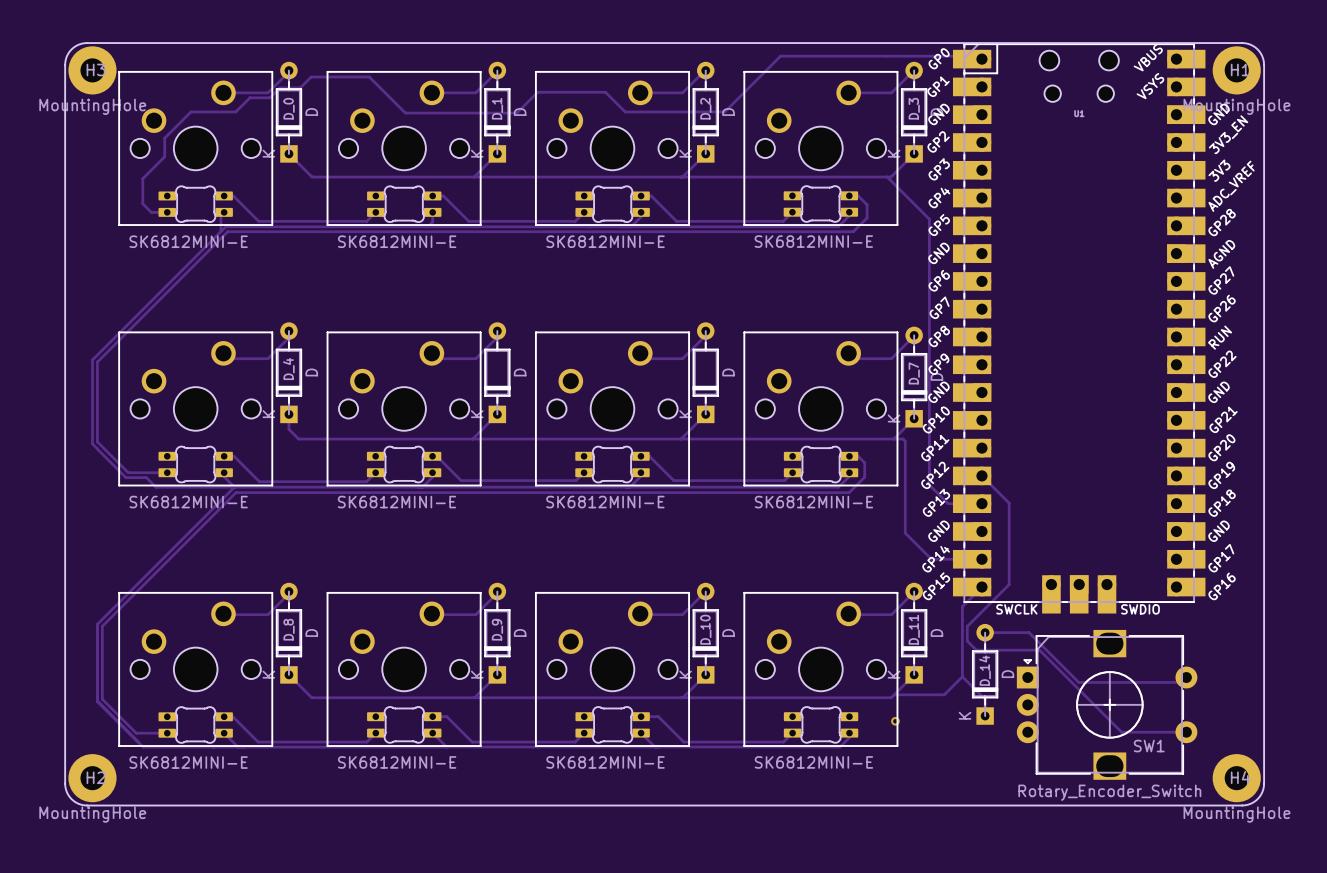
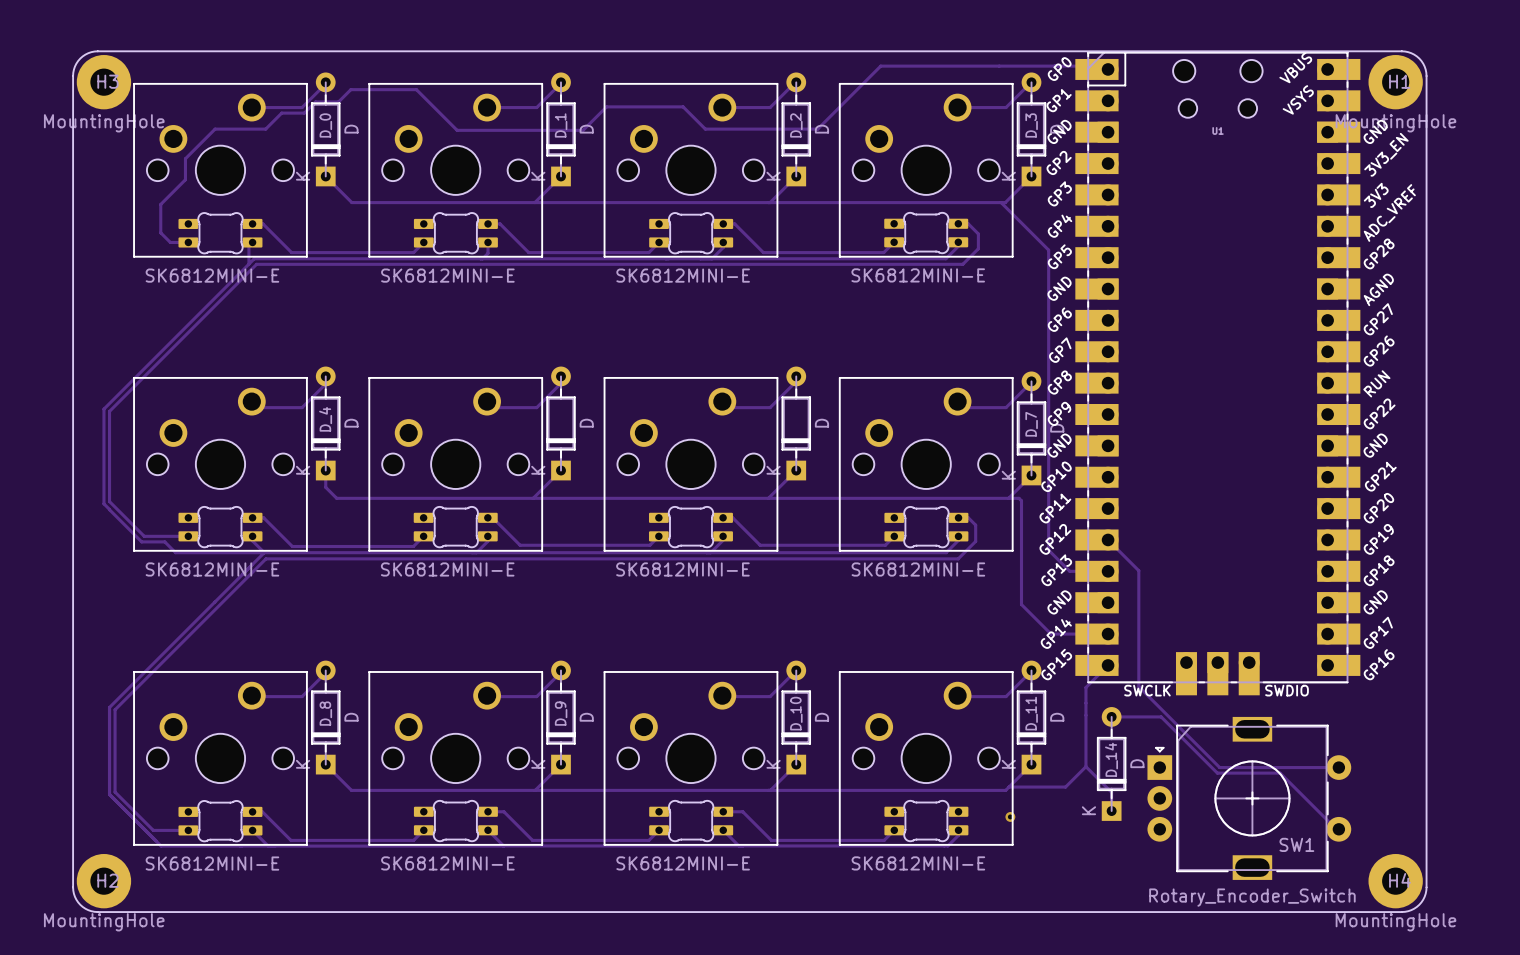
track: (1009, 584) (967, 626) (967, 641) (976, 650) (1039, 650) (1121, 732) (1184, 732) -> (1138, 662) (1138, 686) (1219, 767) (1338, 767)
SW1 footprint: [1016, 629, 1198, 780] -> [1147, 716, 1352, 880]
track: (1186, 677) (1181, 682) (1134, 682) -> (1336, 829) (1280, 773)

